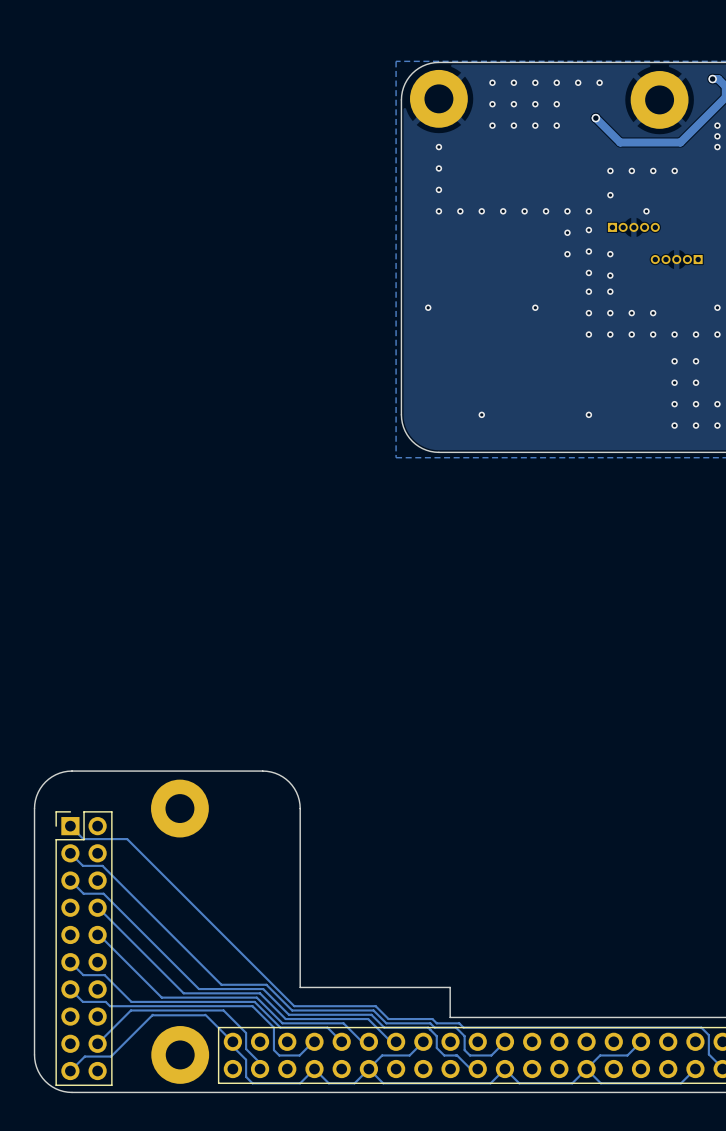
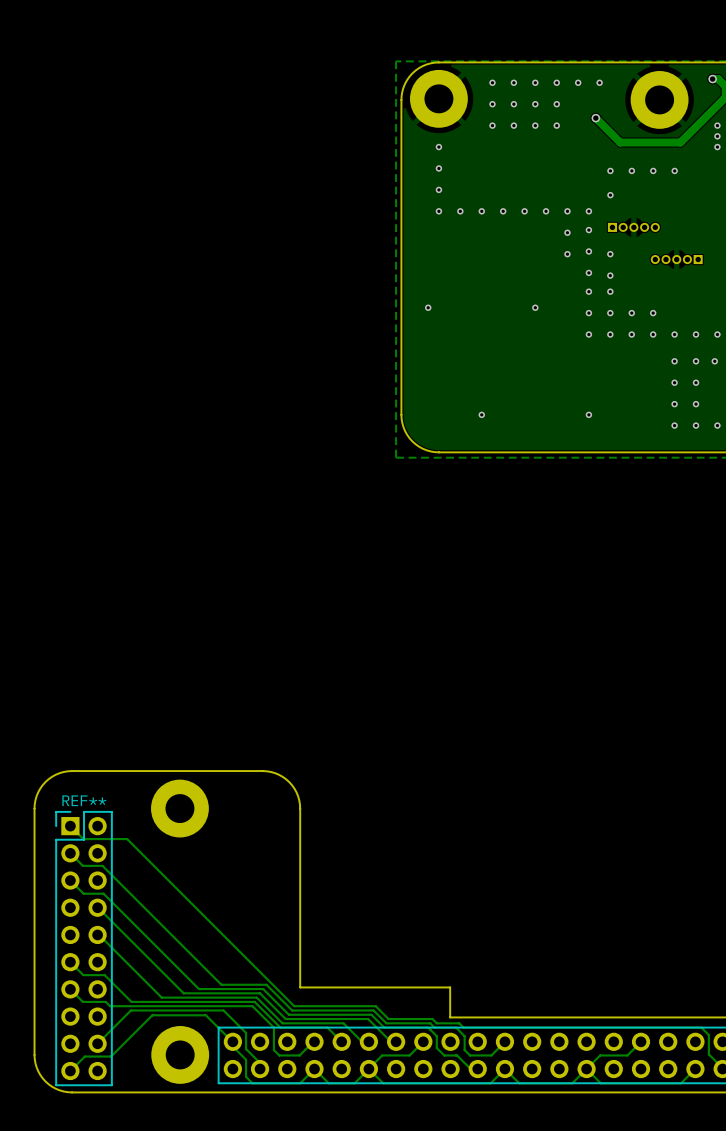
via: (646, 211) -> none
via: (717, 307) -> none
via: none -> (714, 361)
via: (717, 404) -> none
REF** name: none -> REF** (84, 800)

